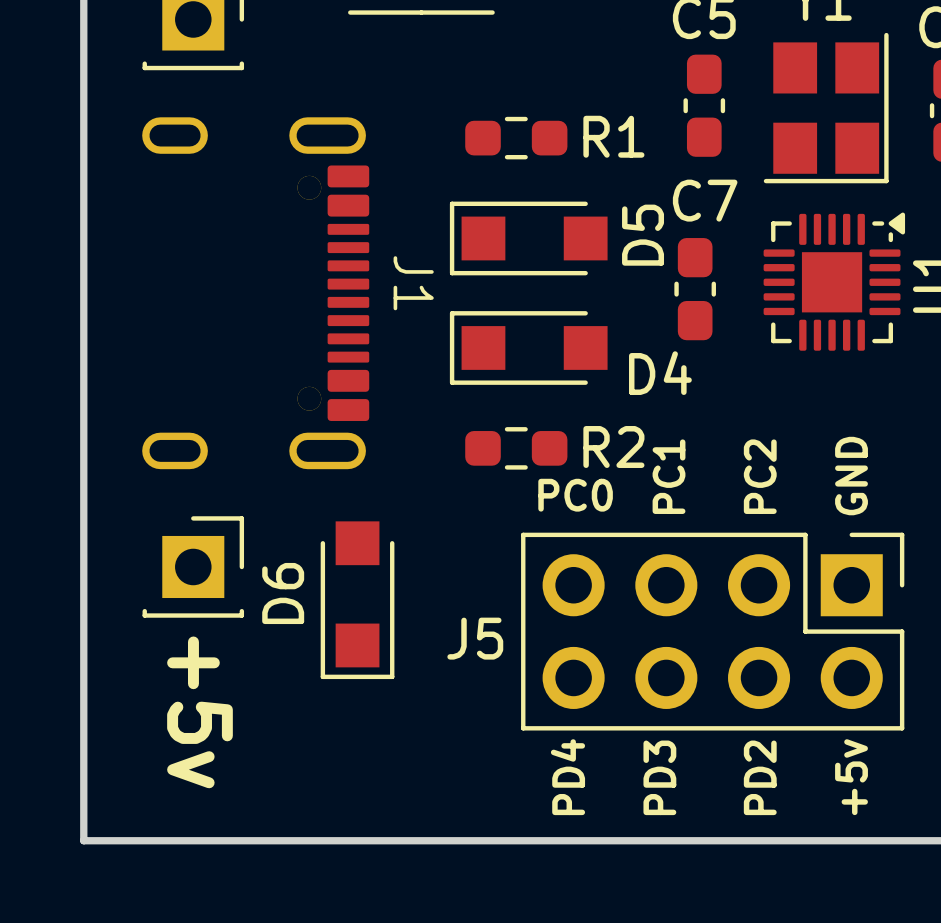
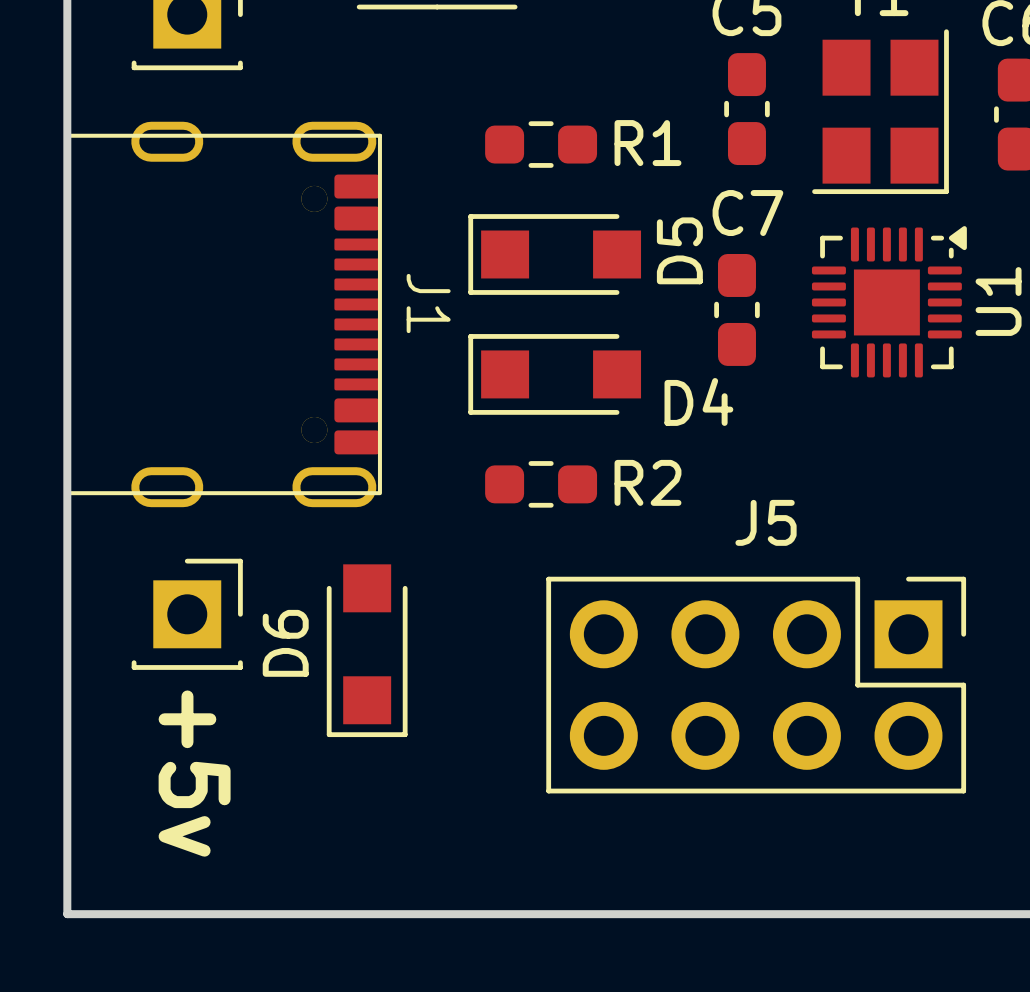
J1 footprint: [142, 117, 370, 470] -> [64, 121, 382, 508]
text: PC1 (669, 476) -> none
text: PC2 (760, 476) -> none
text: GND (851, 476) -> none
text: PC0 (575, 495) -> none
J5 name position: J5 (475, 638) -> J5 (766, 522)
text: PD4 (567, 777) -> none
text: PD3 (659, 777) -> none
text: PD2 (760, 777) -> none
text: +5v (851, 777) -> none

